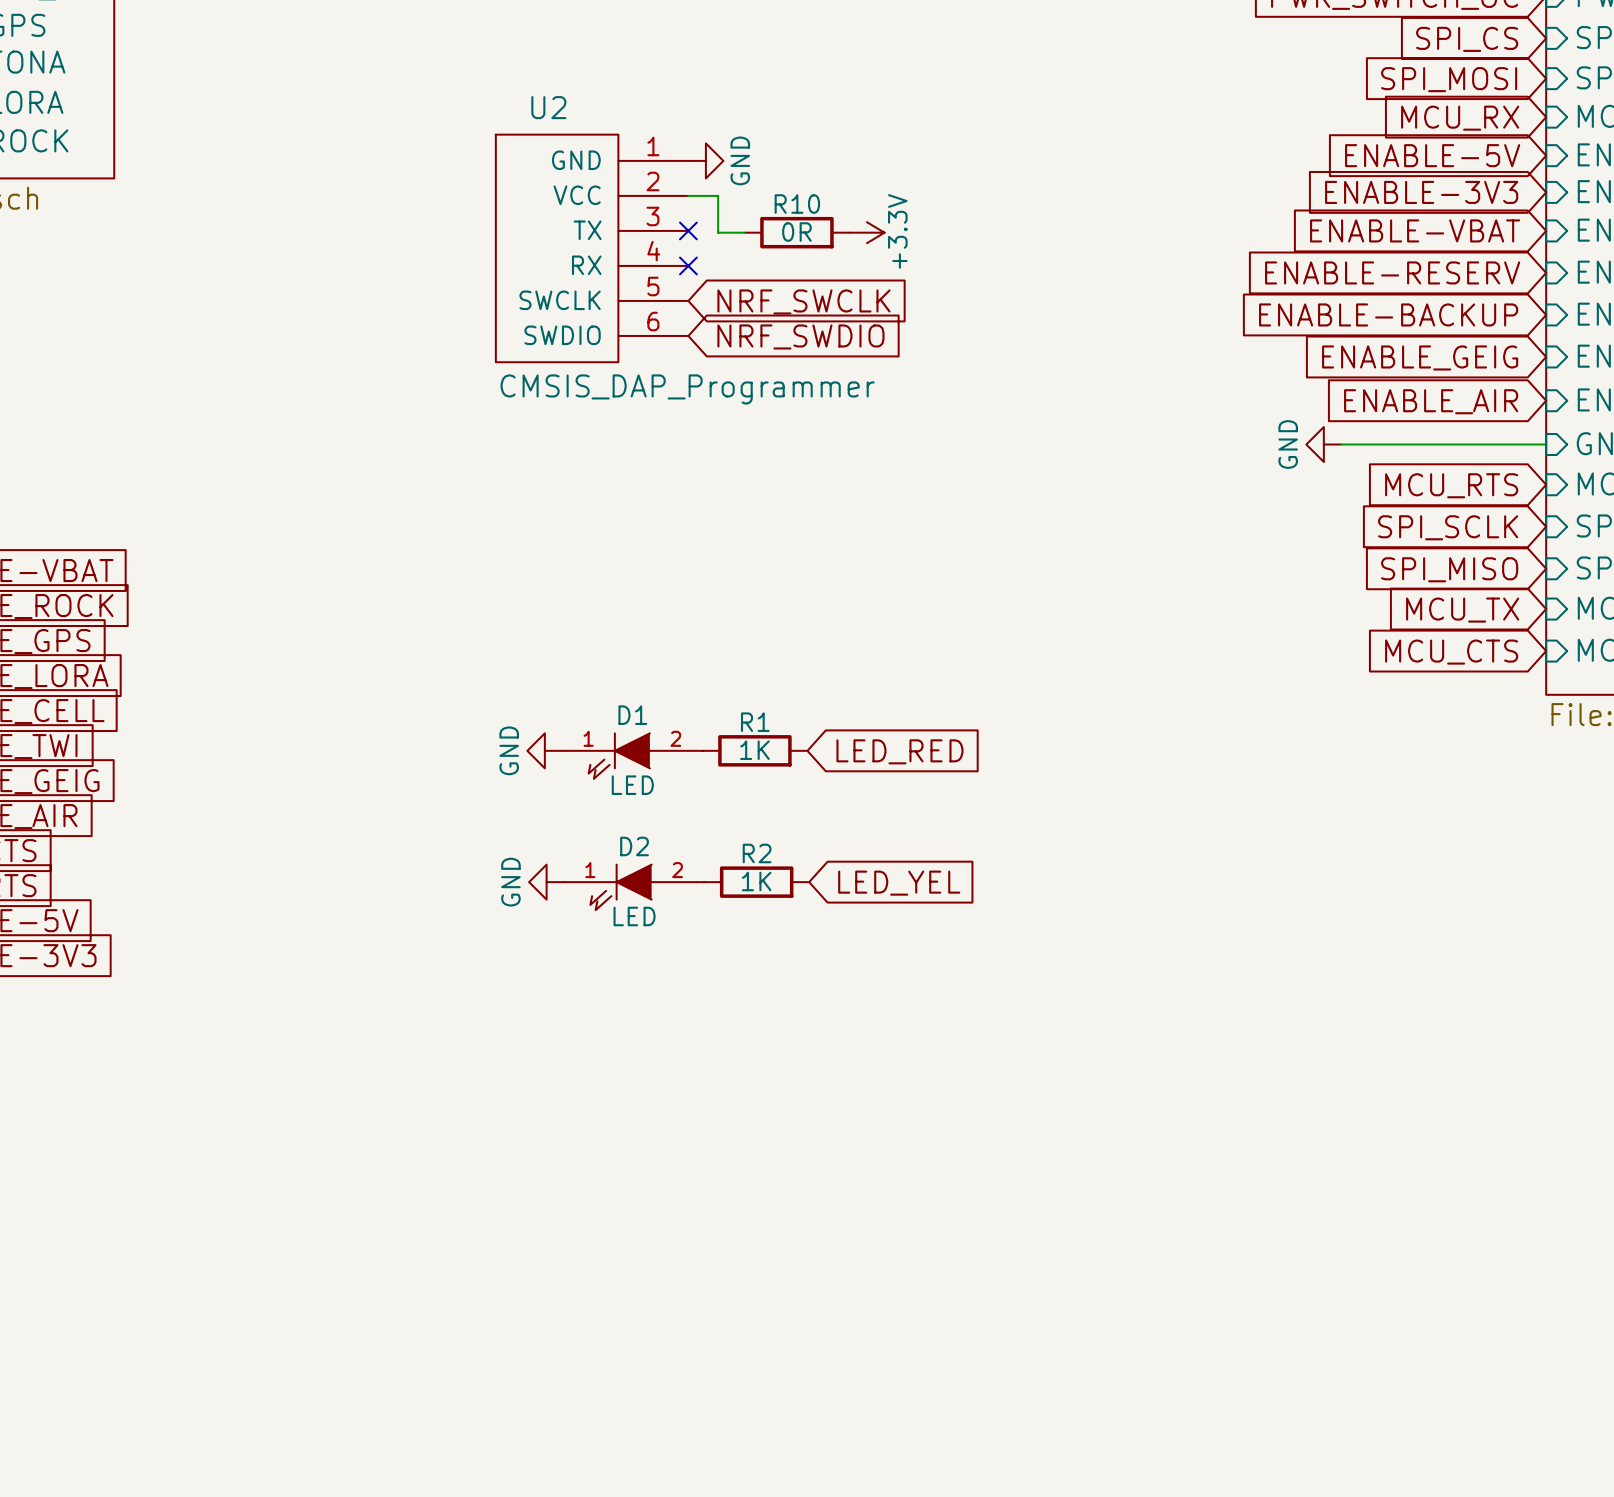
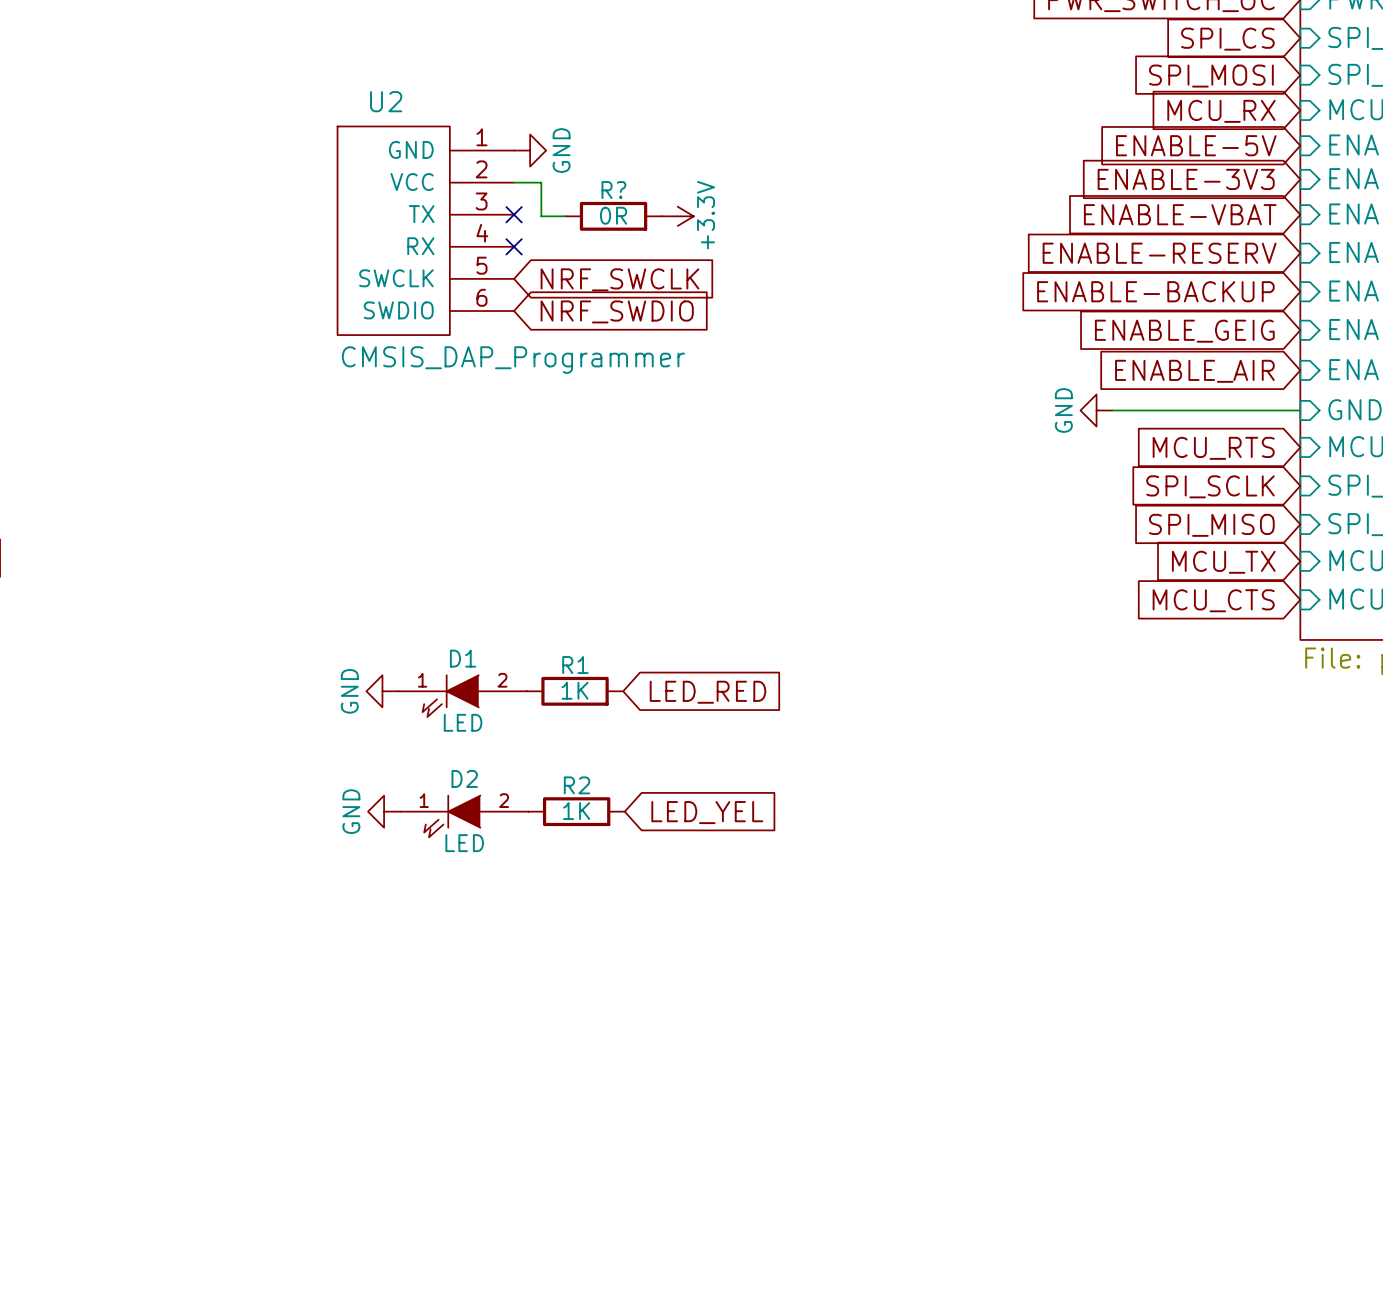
R10 name: R10 (797, 204) -> R? (613, 190)

